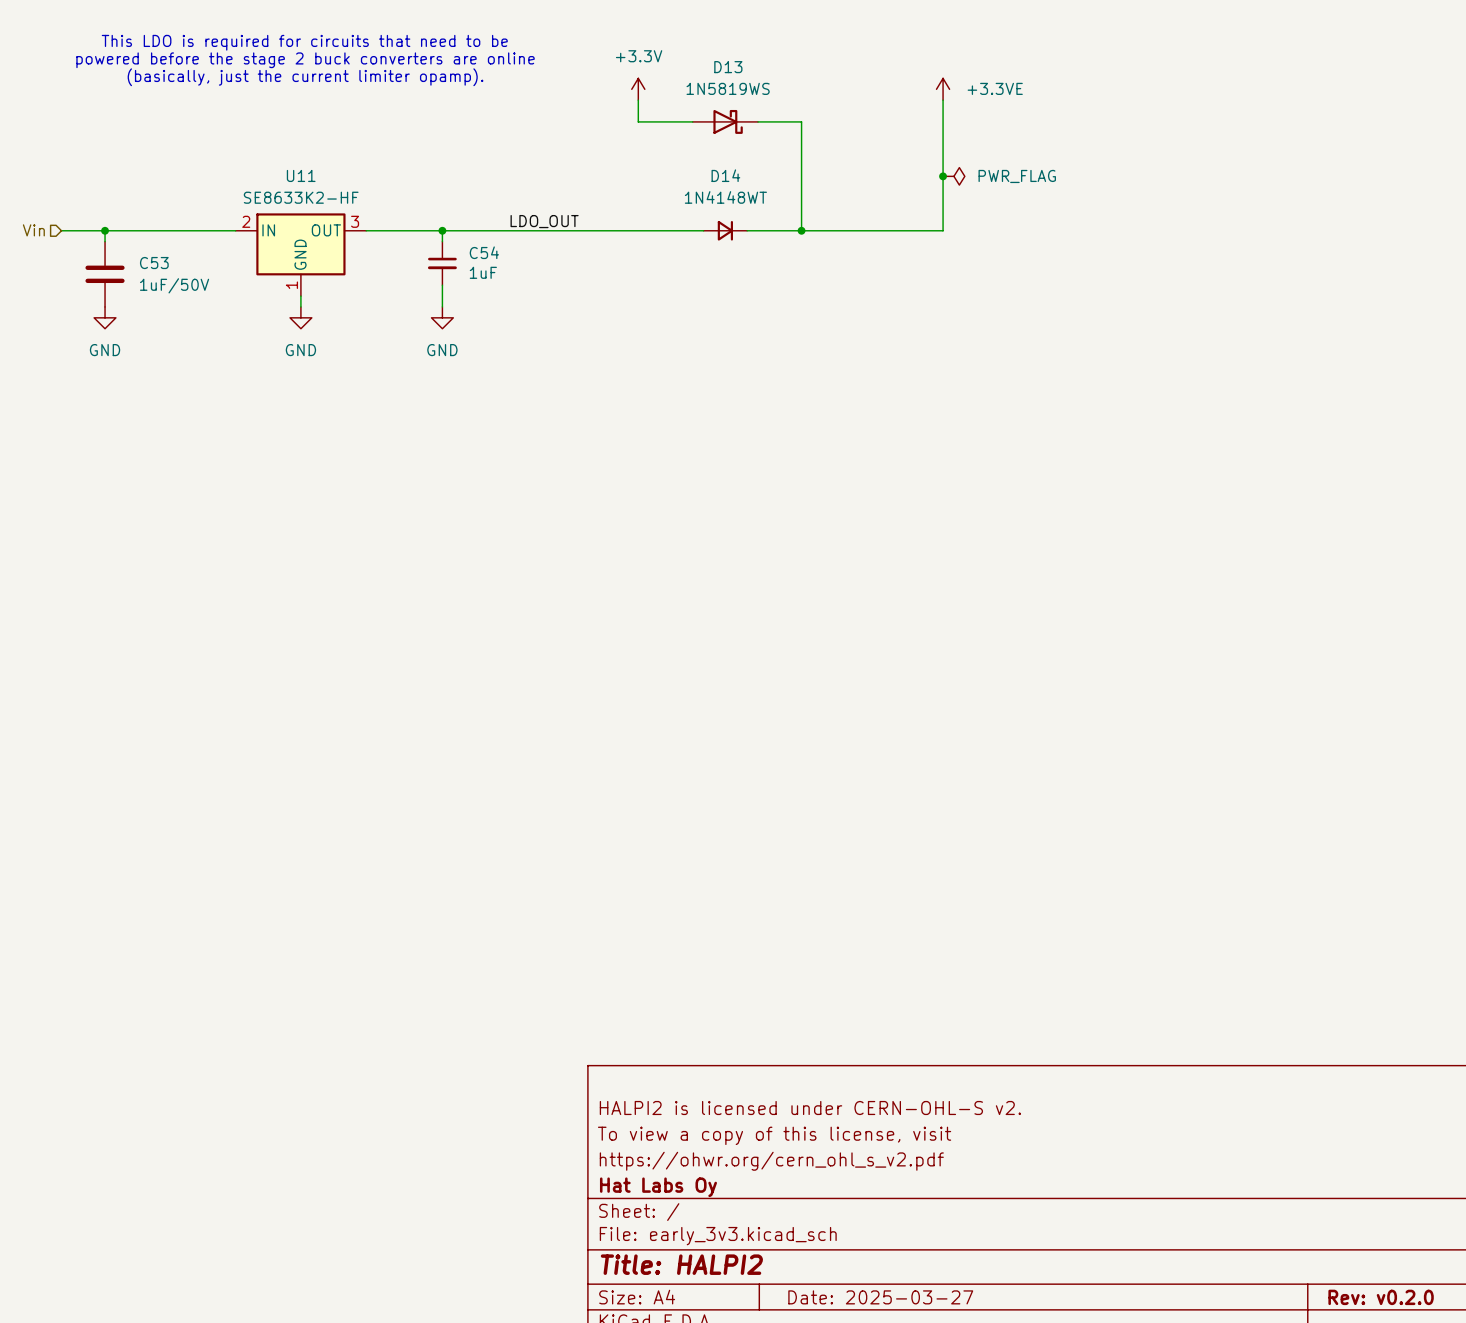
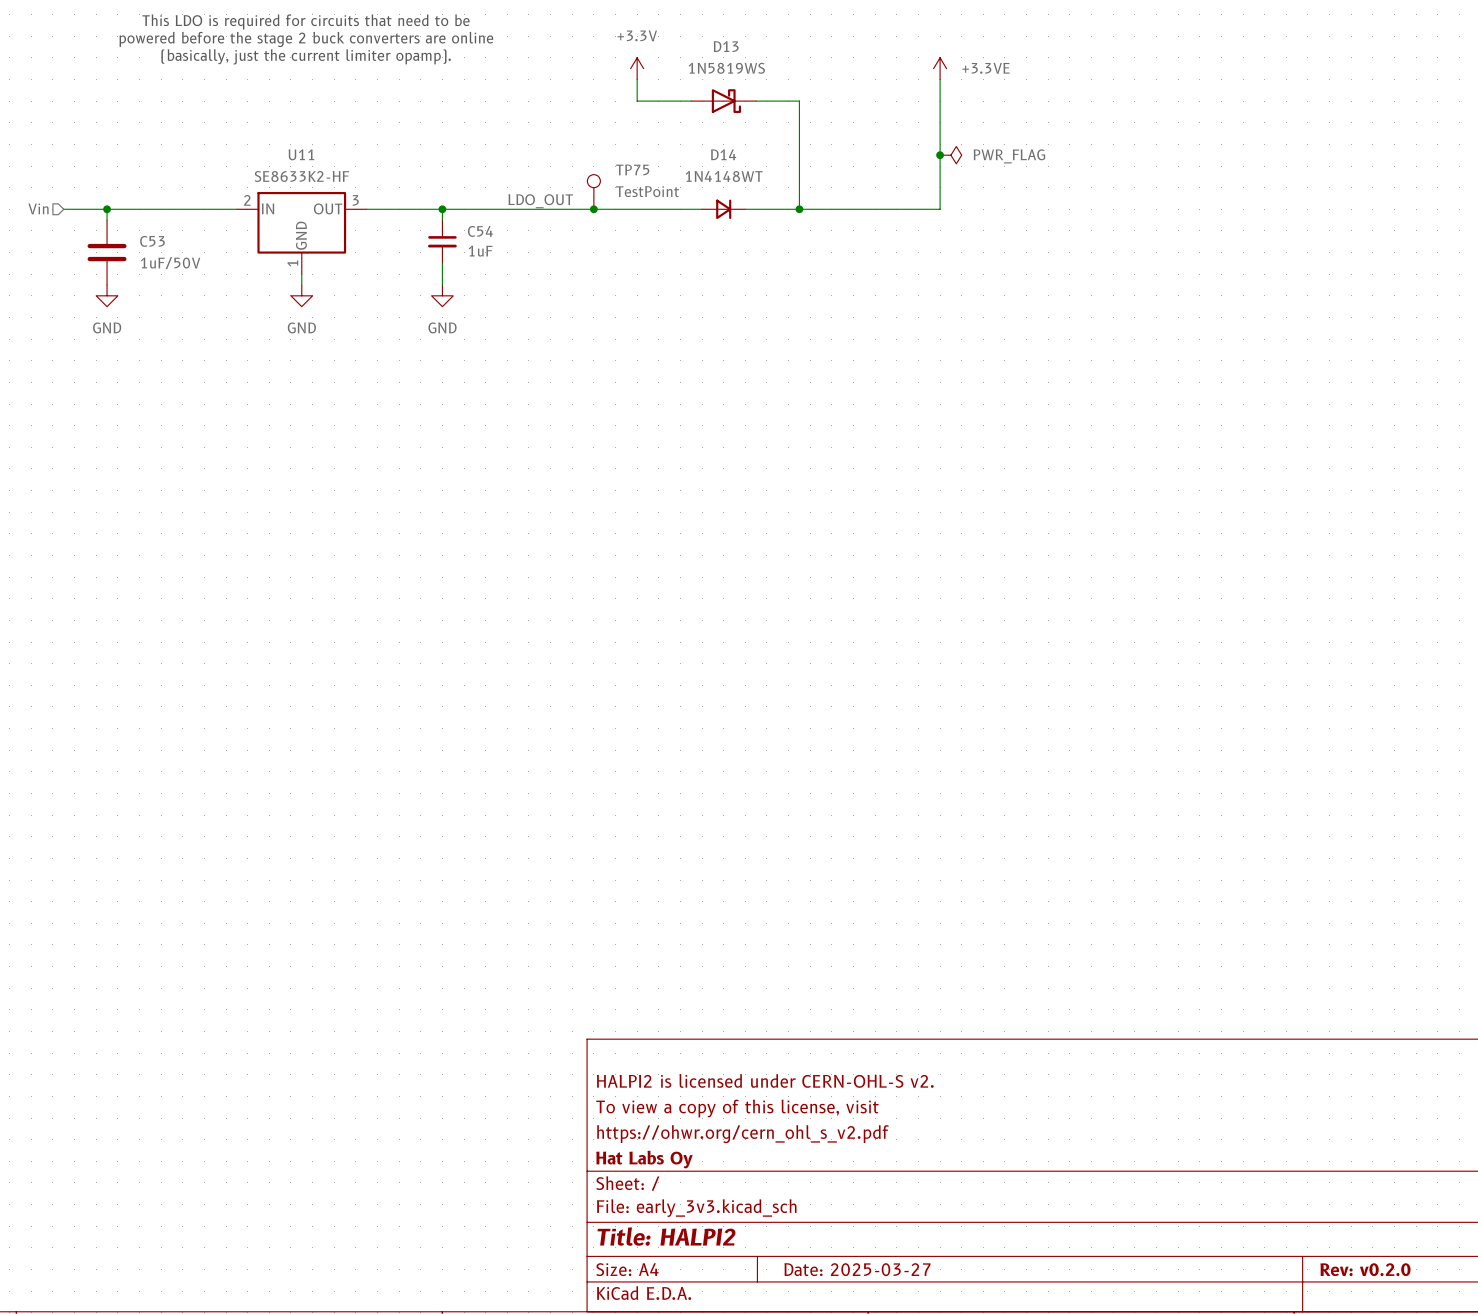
TP75: none -> TestPoint (593, 191)
junction: none -> (593, 209)

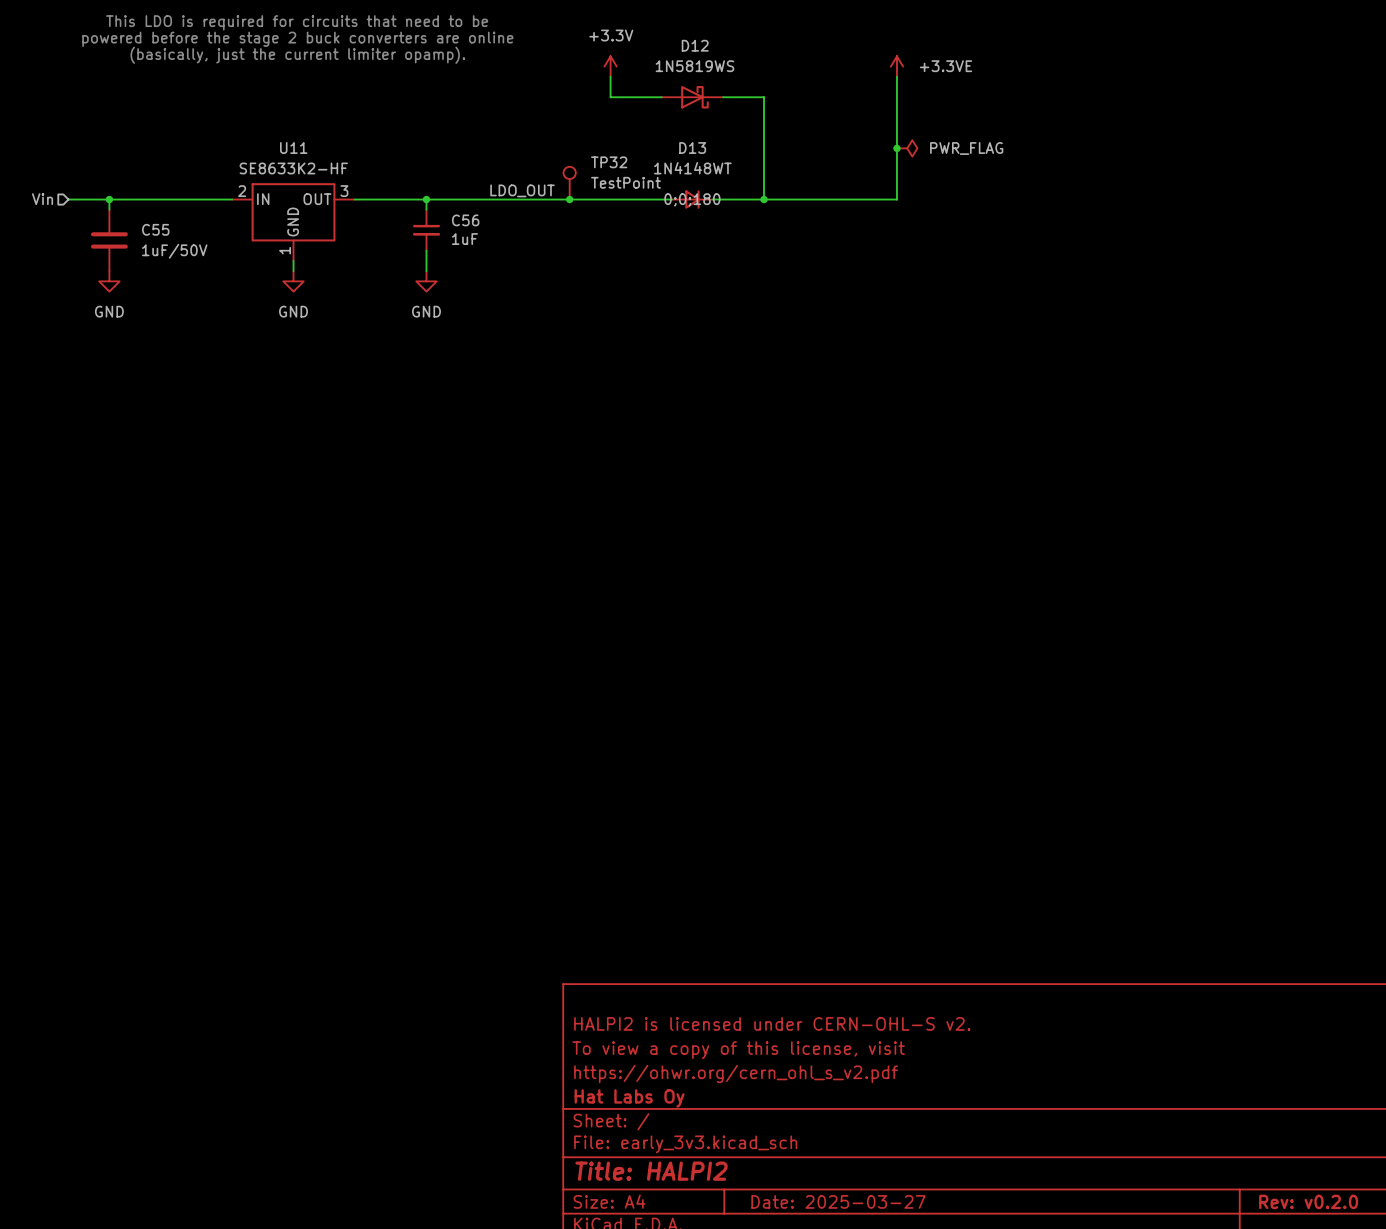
D13 name: D13 (726, 46) -> D12 (695, 45)
D14 name: D14 (723, 154) -> D13 (692, 148)
TP75 name: TP75 (632, 169) -> TP32 (609, 162)
D14 text: none -> 0;0;180 (692, 199)
C54 name: C54 (480, 231) -> C56 (465, 220)
C53 name: C53 (152, 241) -> C55 (155, 229)

